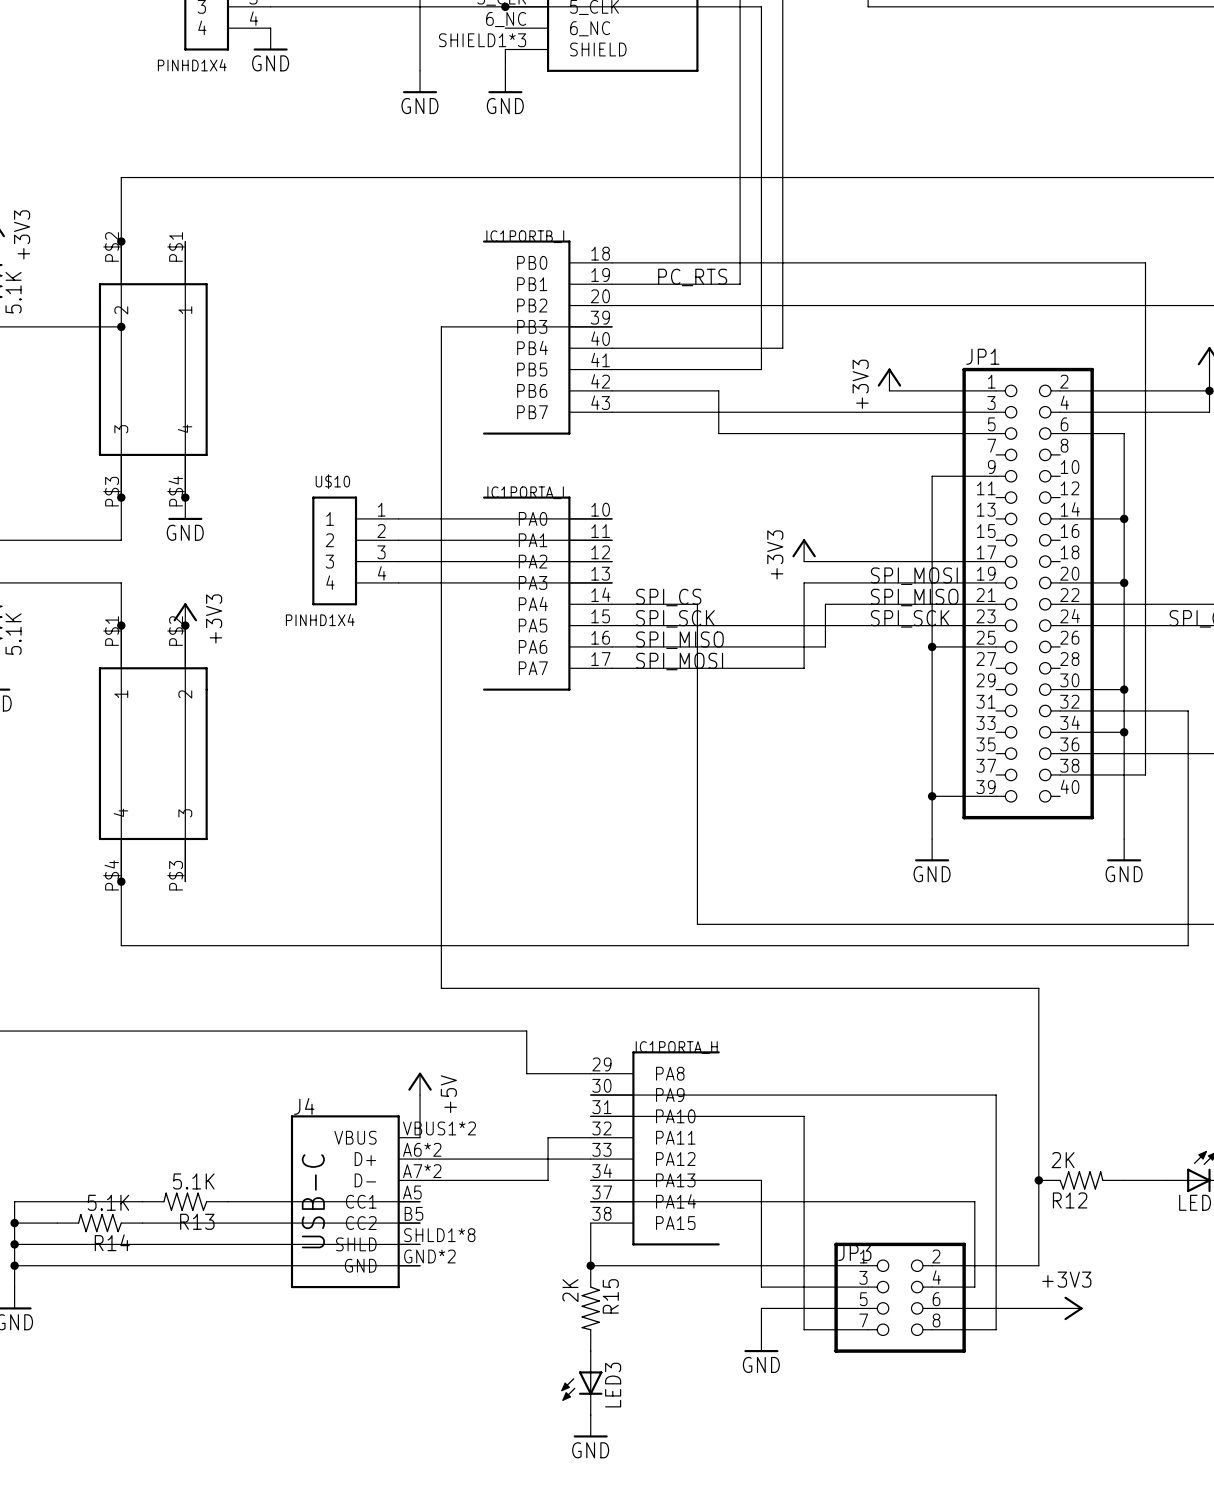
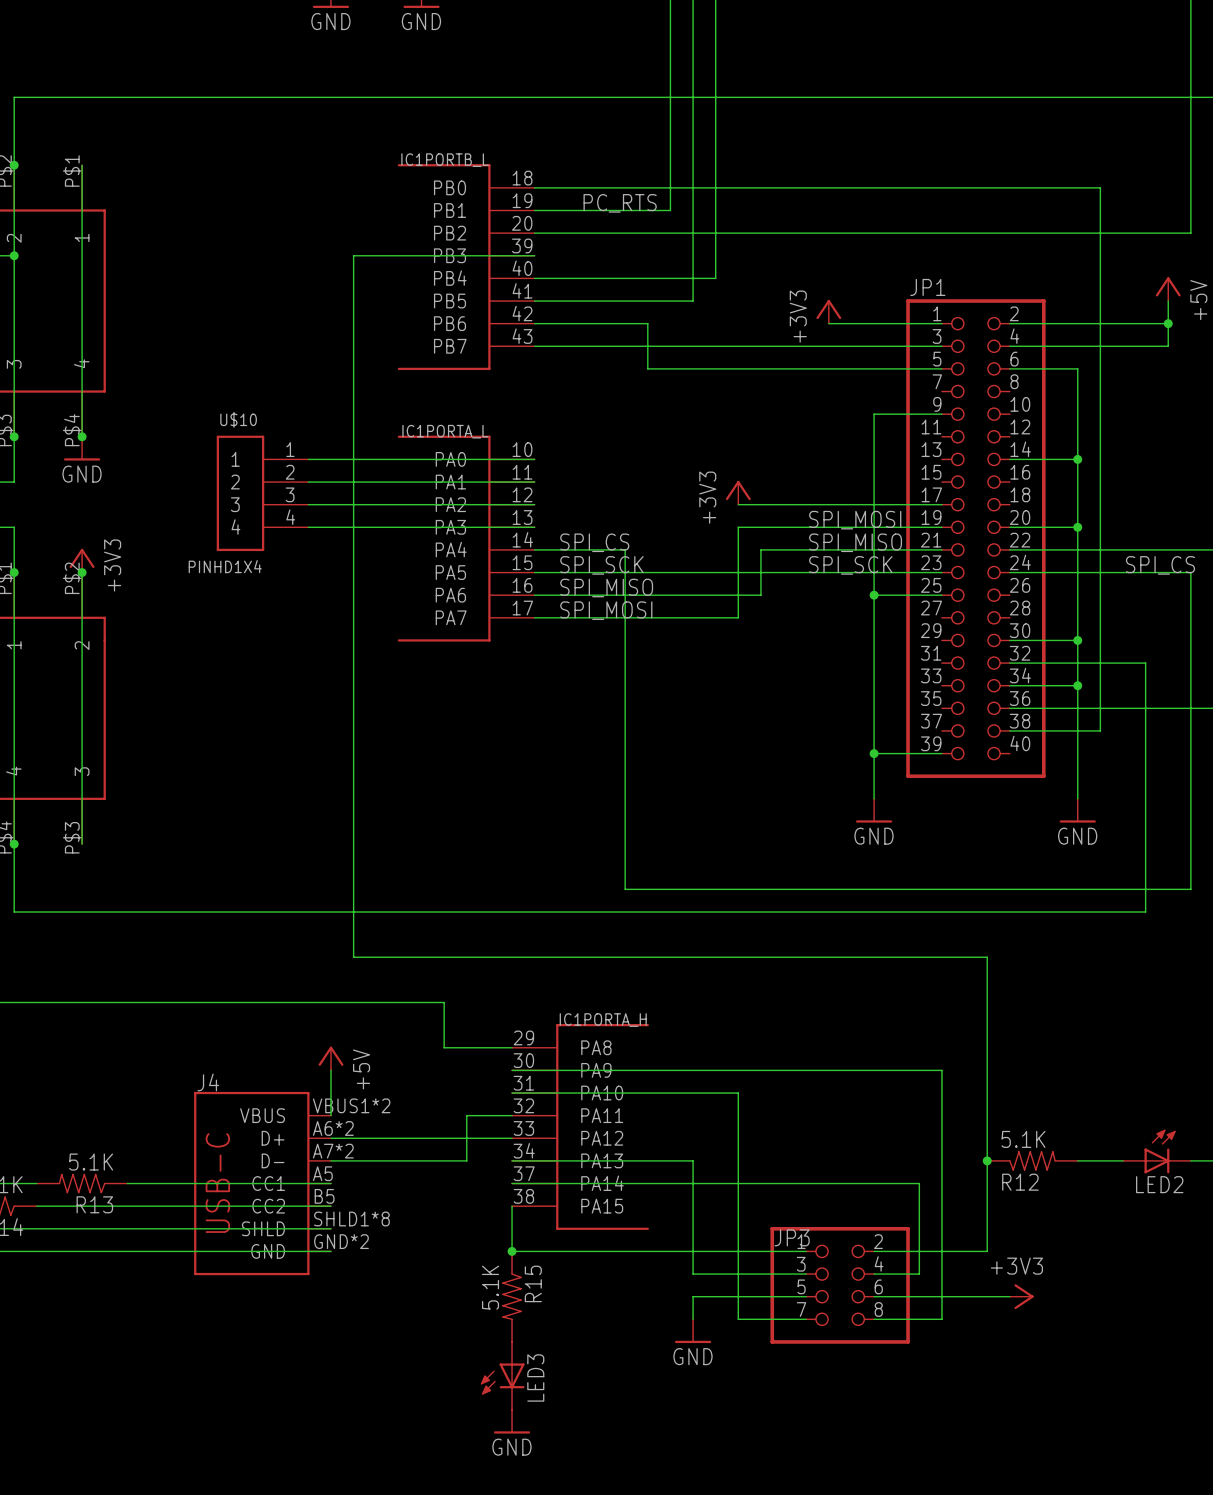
R12 value: 2K (1063, 1160) -> 5.1K (1023, 1139)
R15 value: 2K (570, 1290) -> 5.1K (490, 1287)

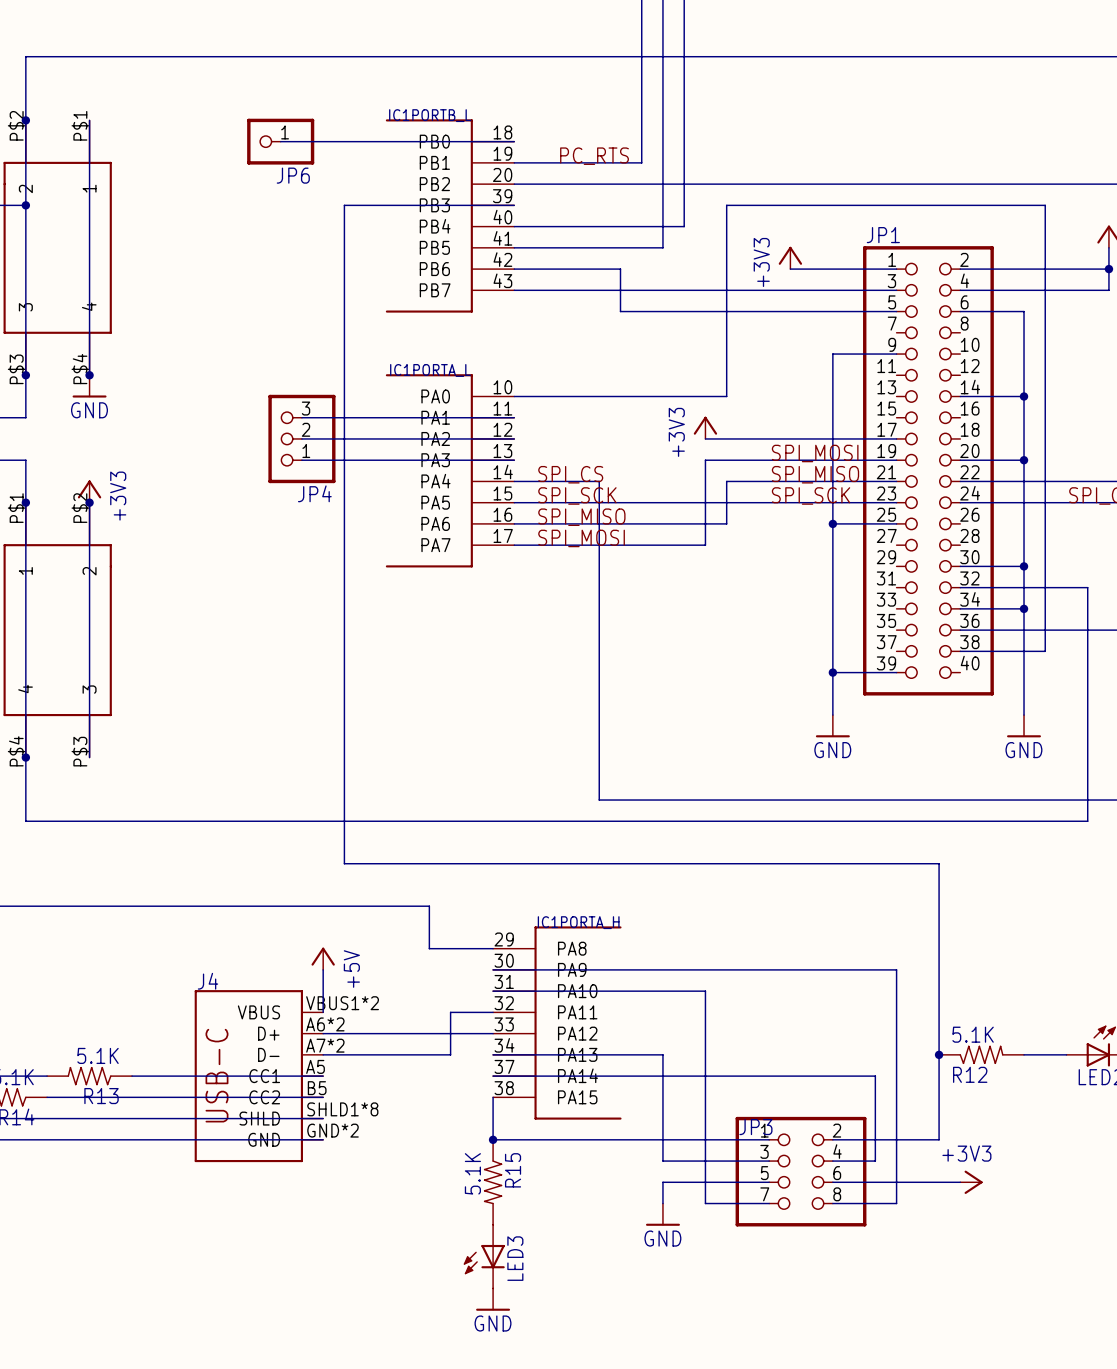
wire: none -> (280, 141) (514, 141)
JP6: none -> (280, 141)
wire: (534, 187) (1100, 187) (1100, 255) -> (514, 396) (726, 396) (726, 205) (1045, 205)
wire: (308, 459) (534, 459) -> none
U$10: PINHD1X4 (262, 493) -> none
JP4: none -> (301, 438)

